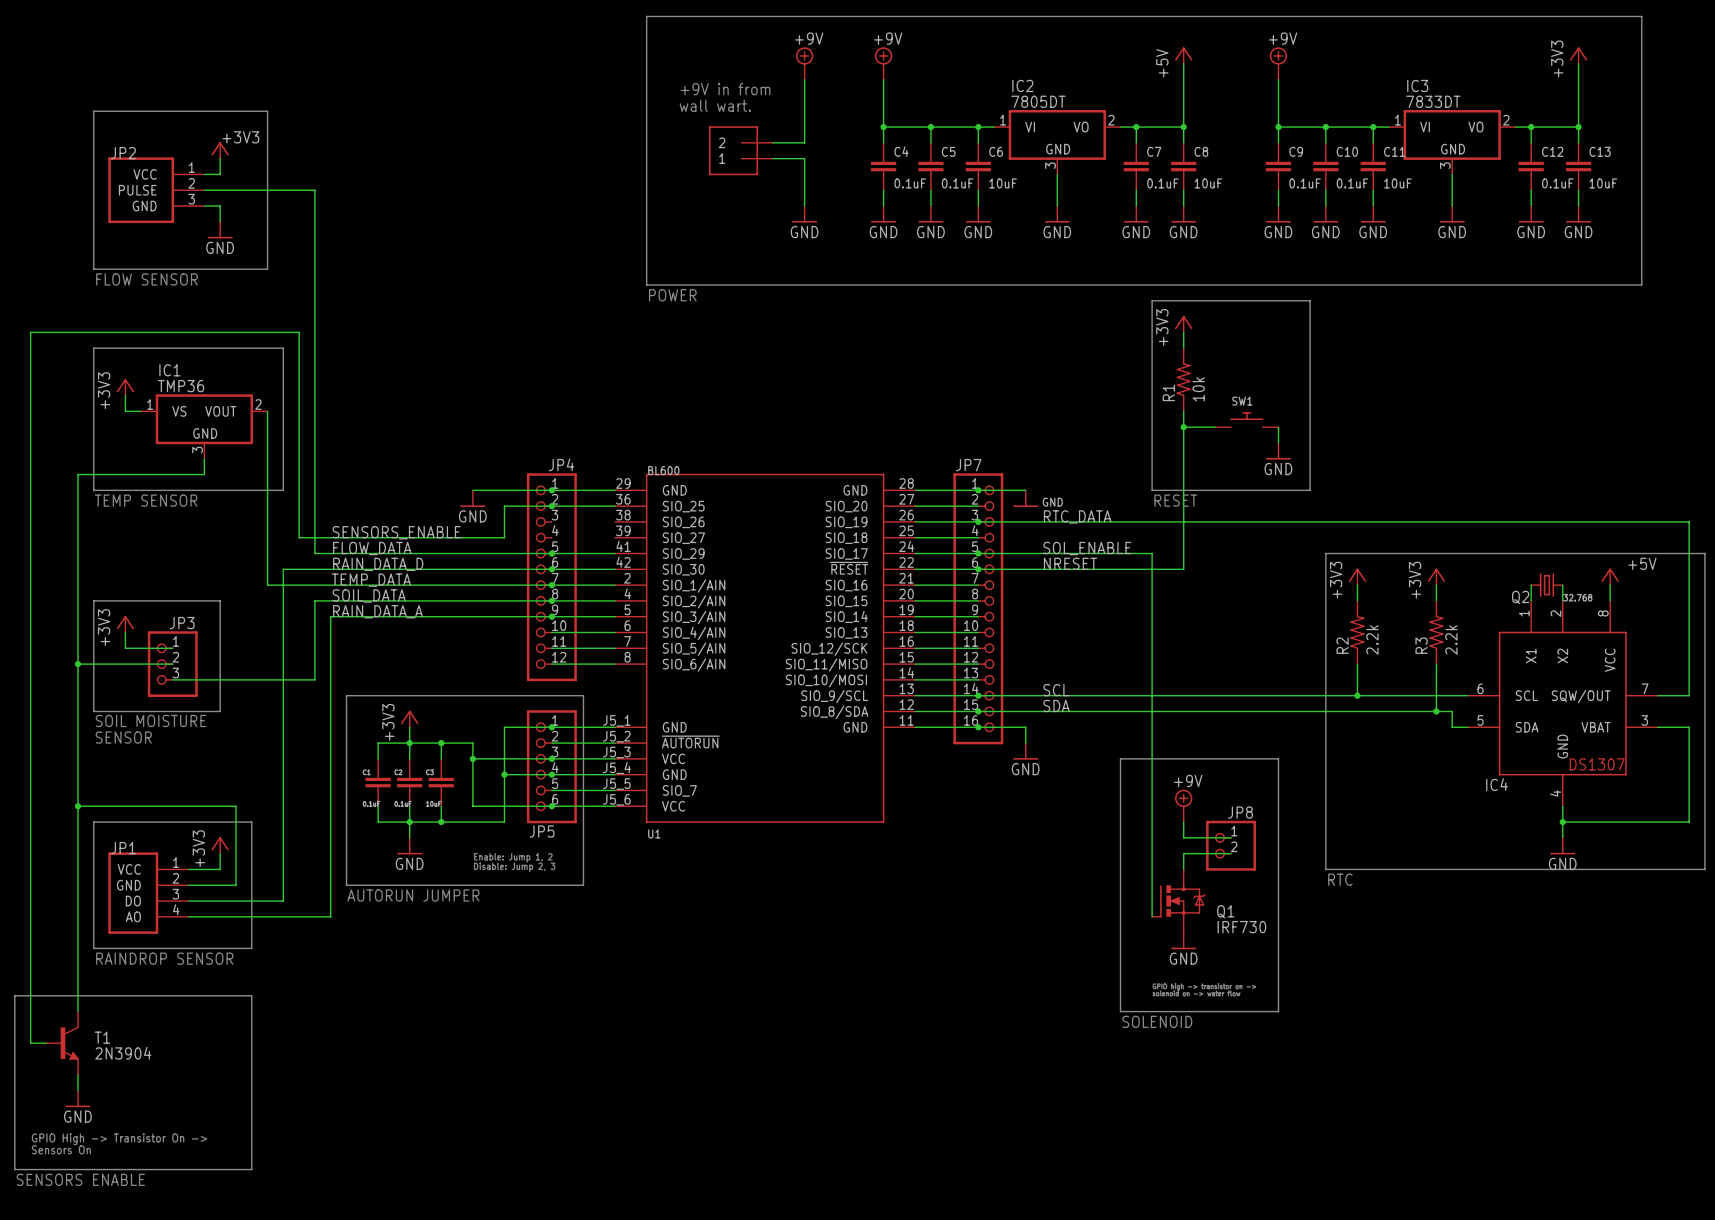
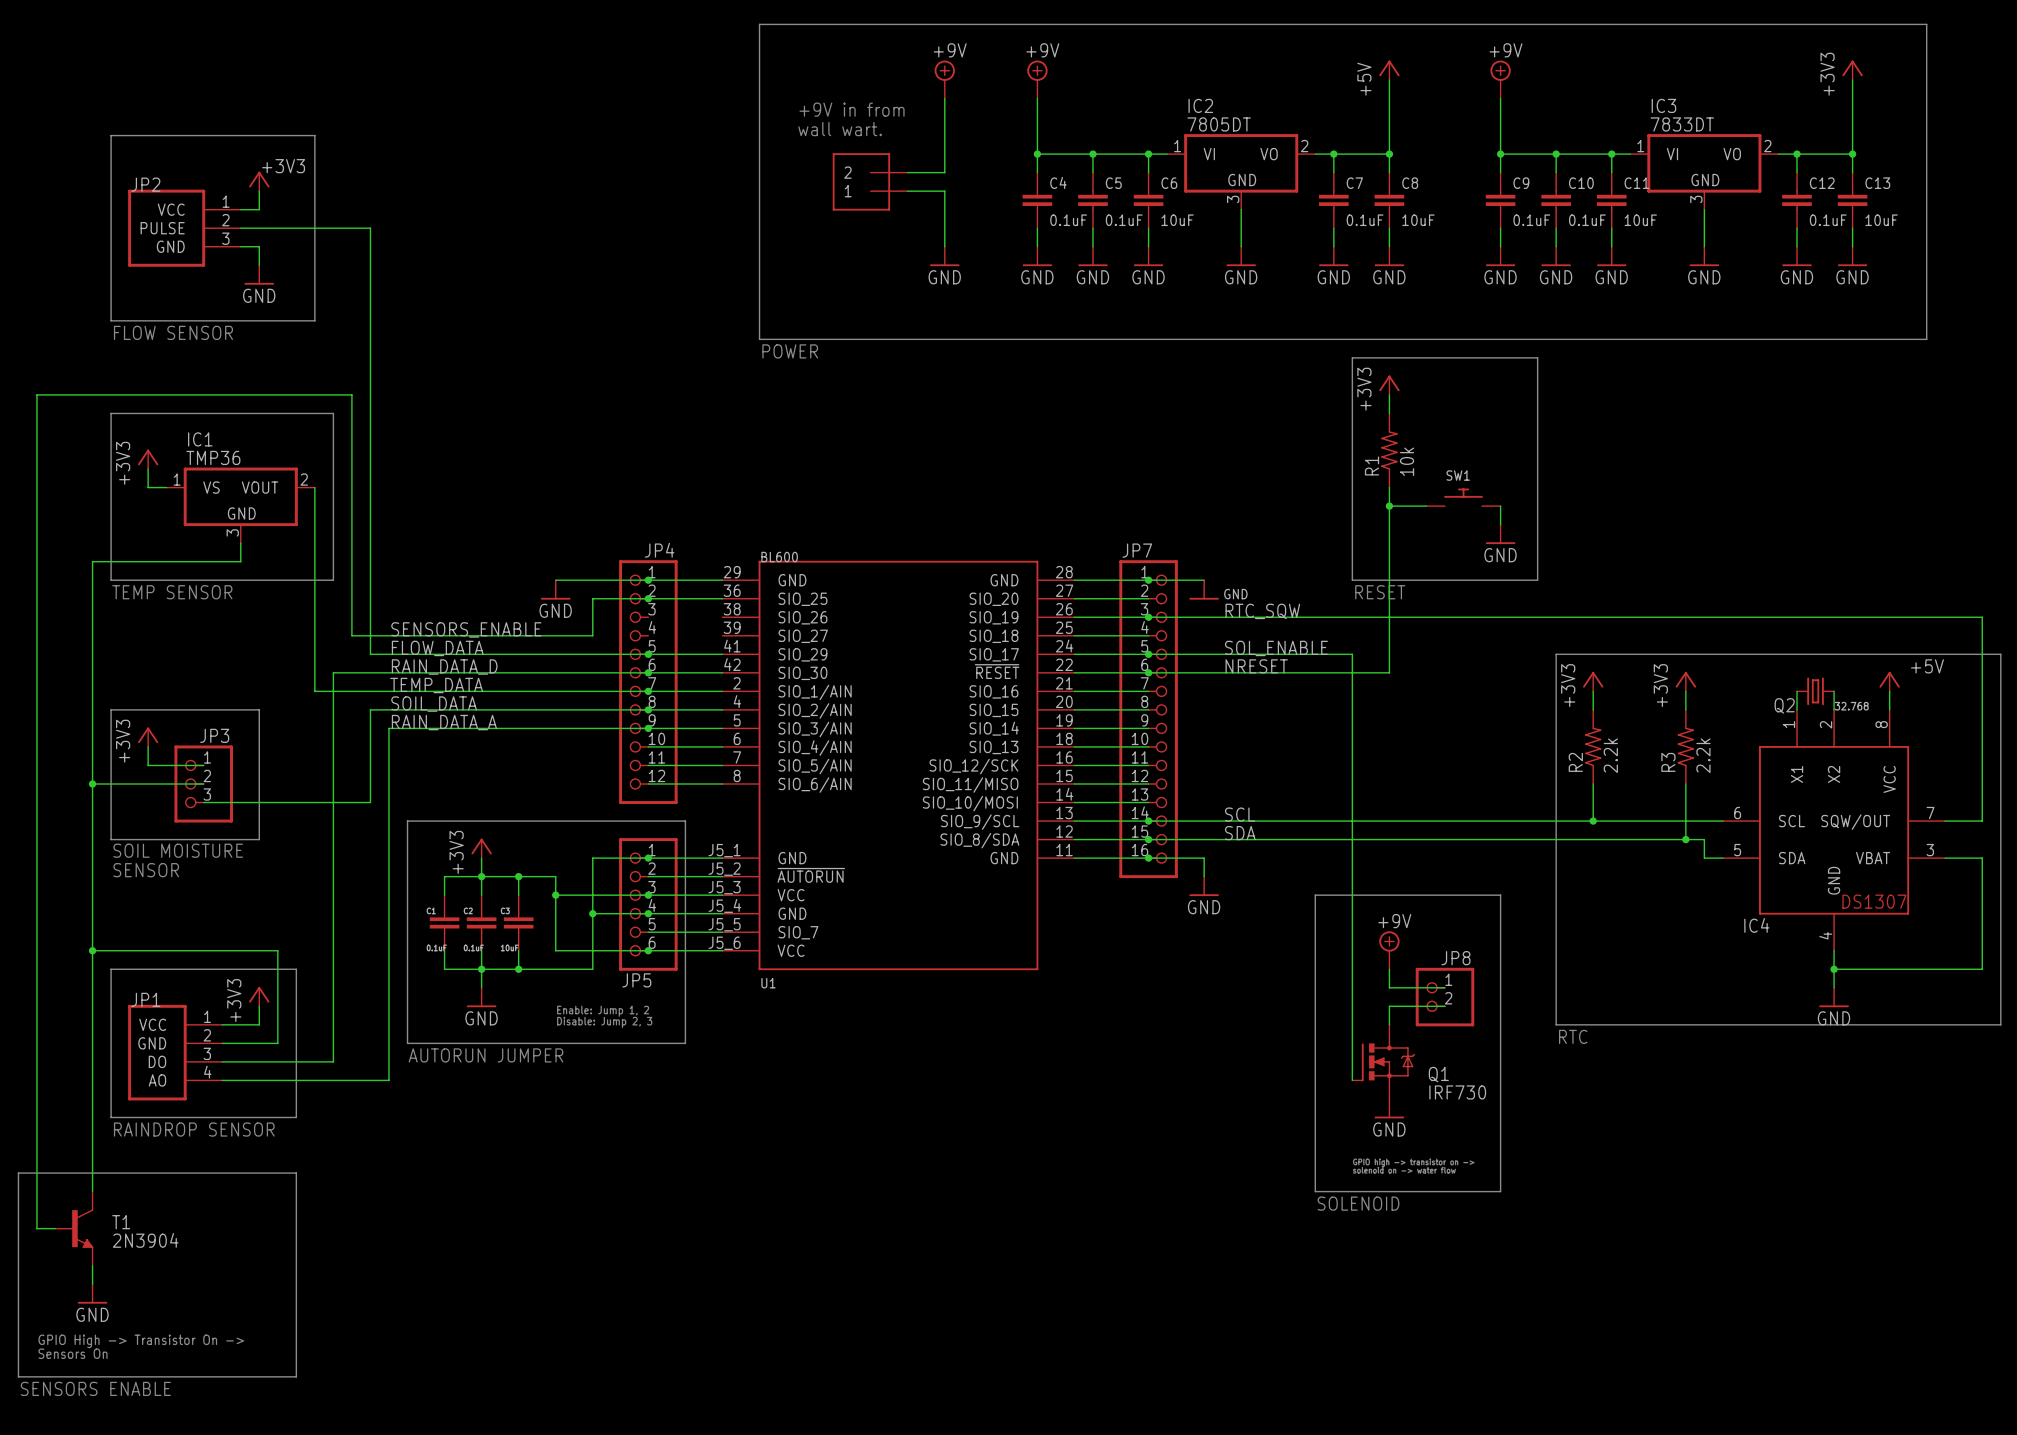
label: RTC_DATA (1077, 516) -> RTC_SQW (1262, 611)

